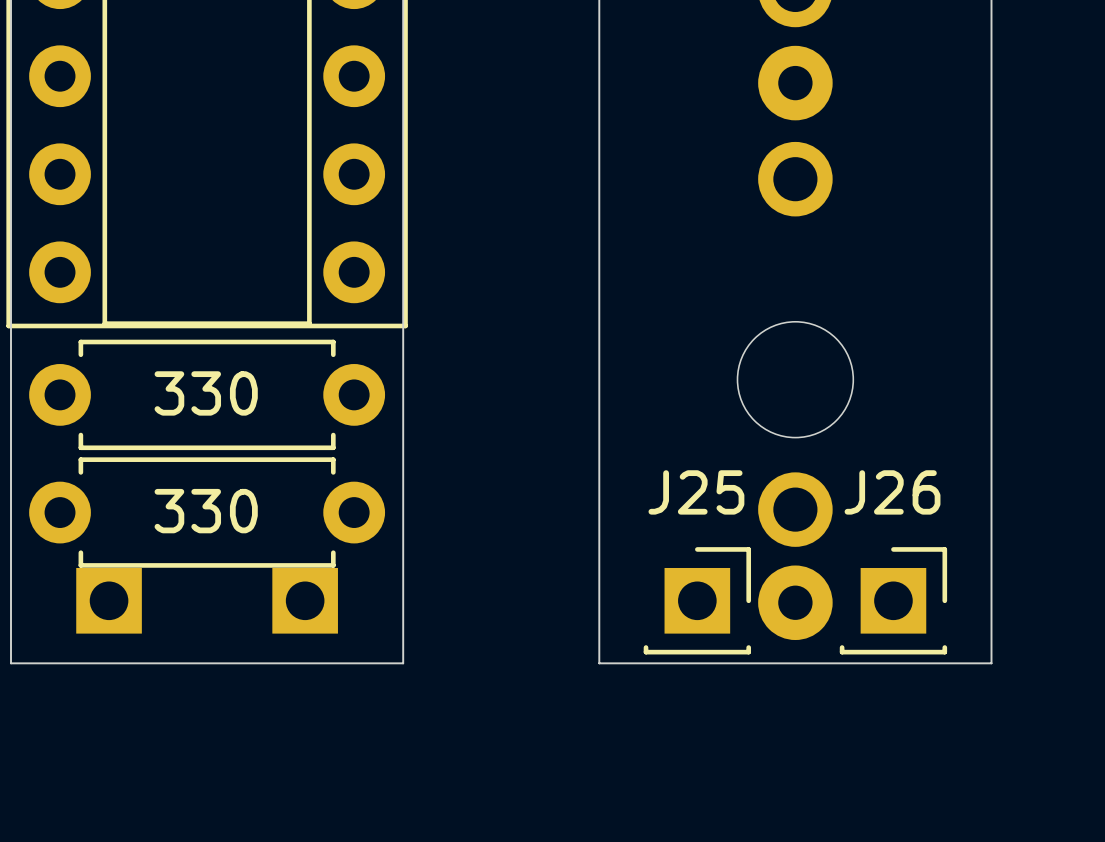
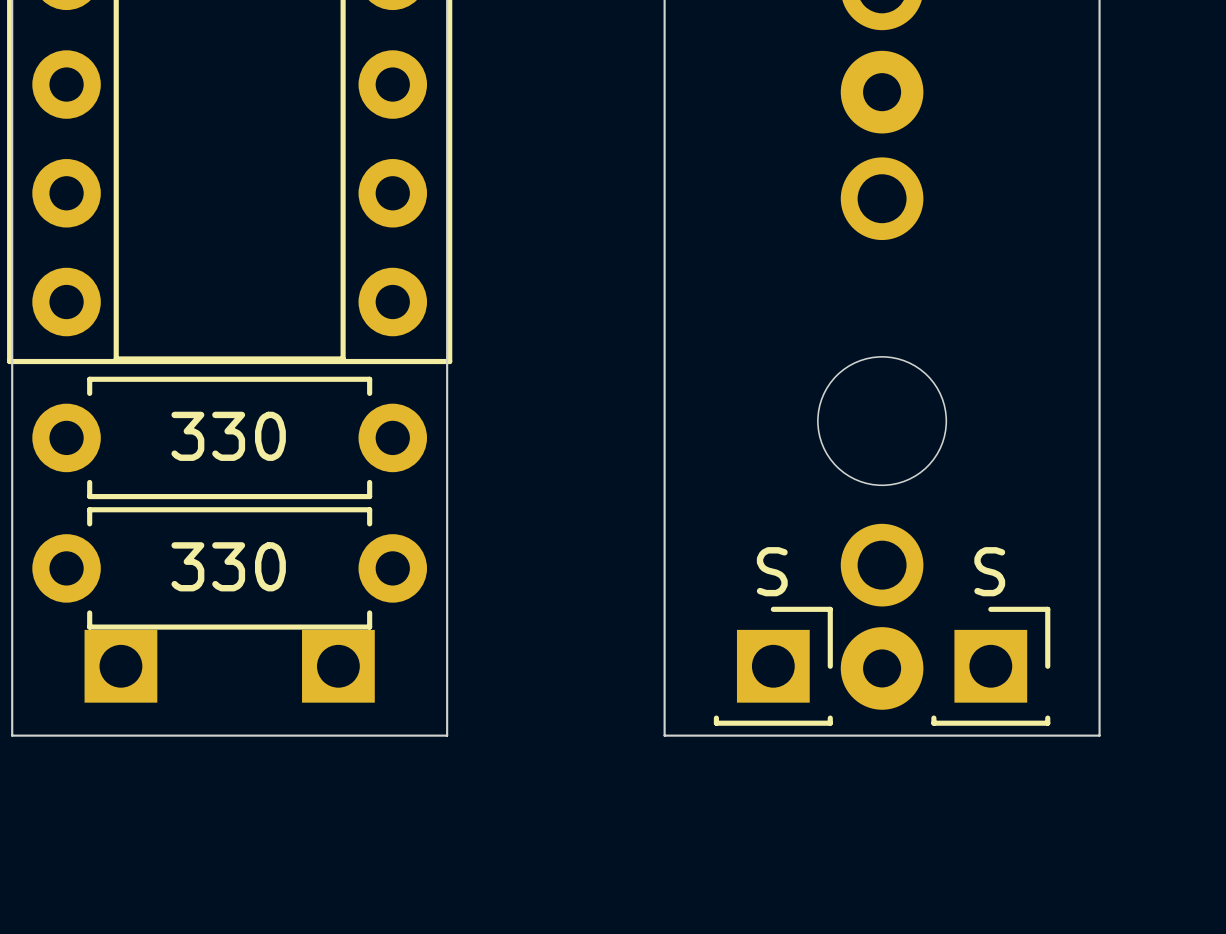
J25 name: J25 (696, 492) -> none
J26 name: J26 (892, 492) -> none
J25 value: none -> S (772, 571)
J26 value: none -> S (989, 571)

